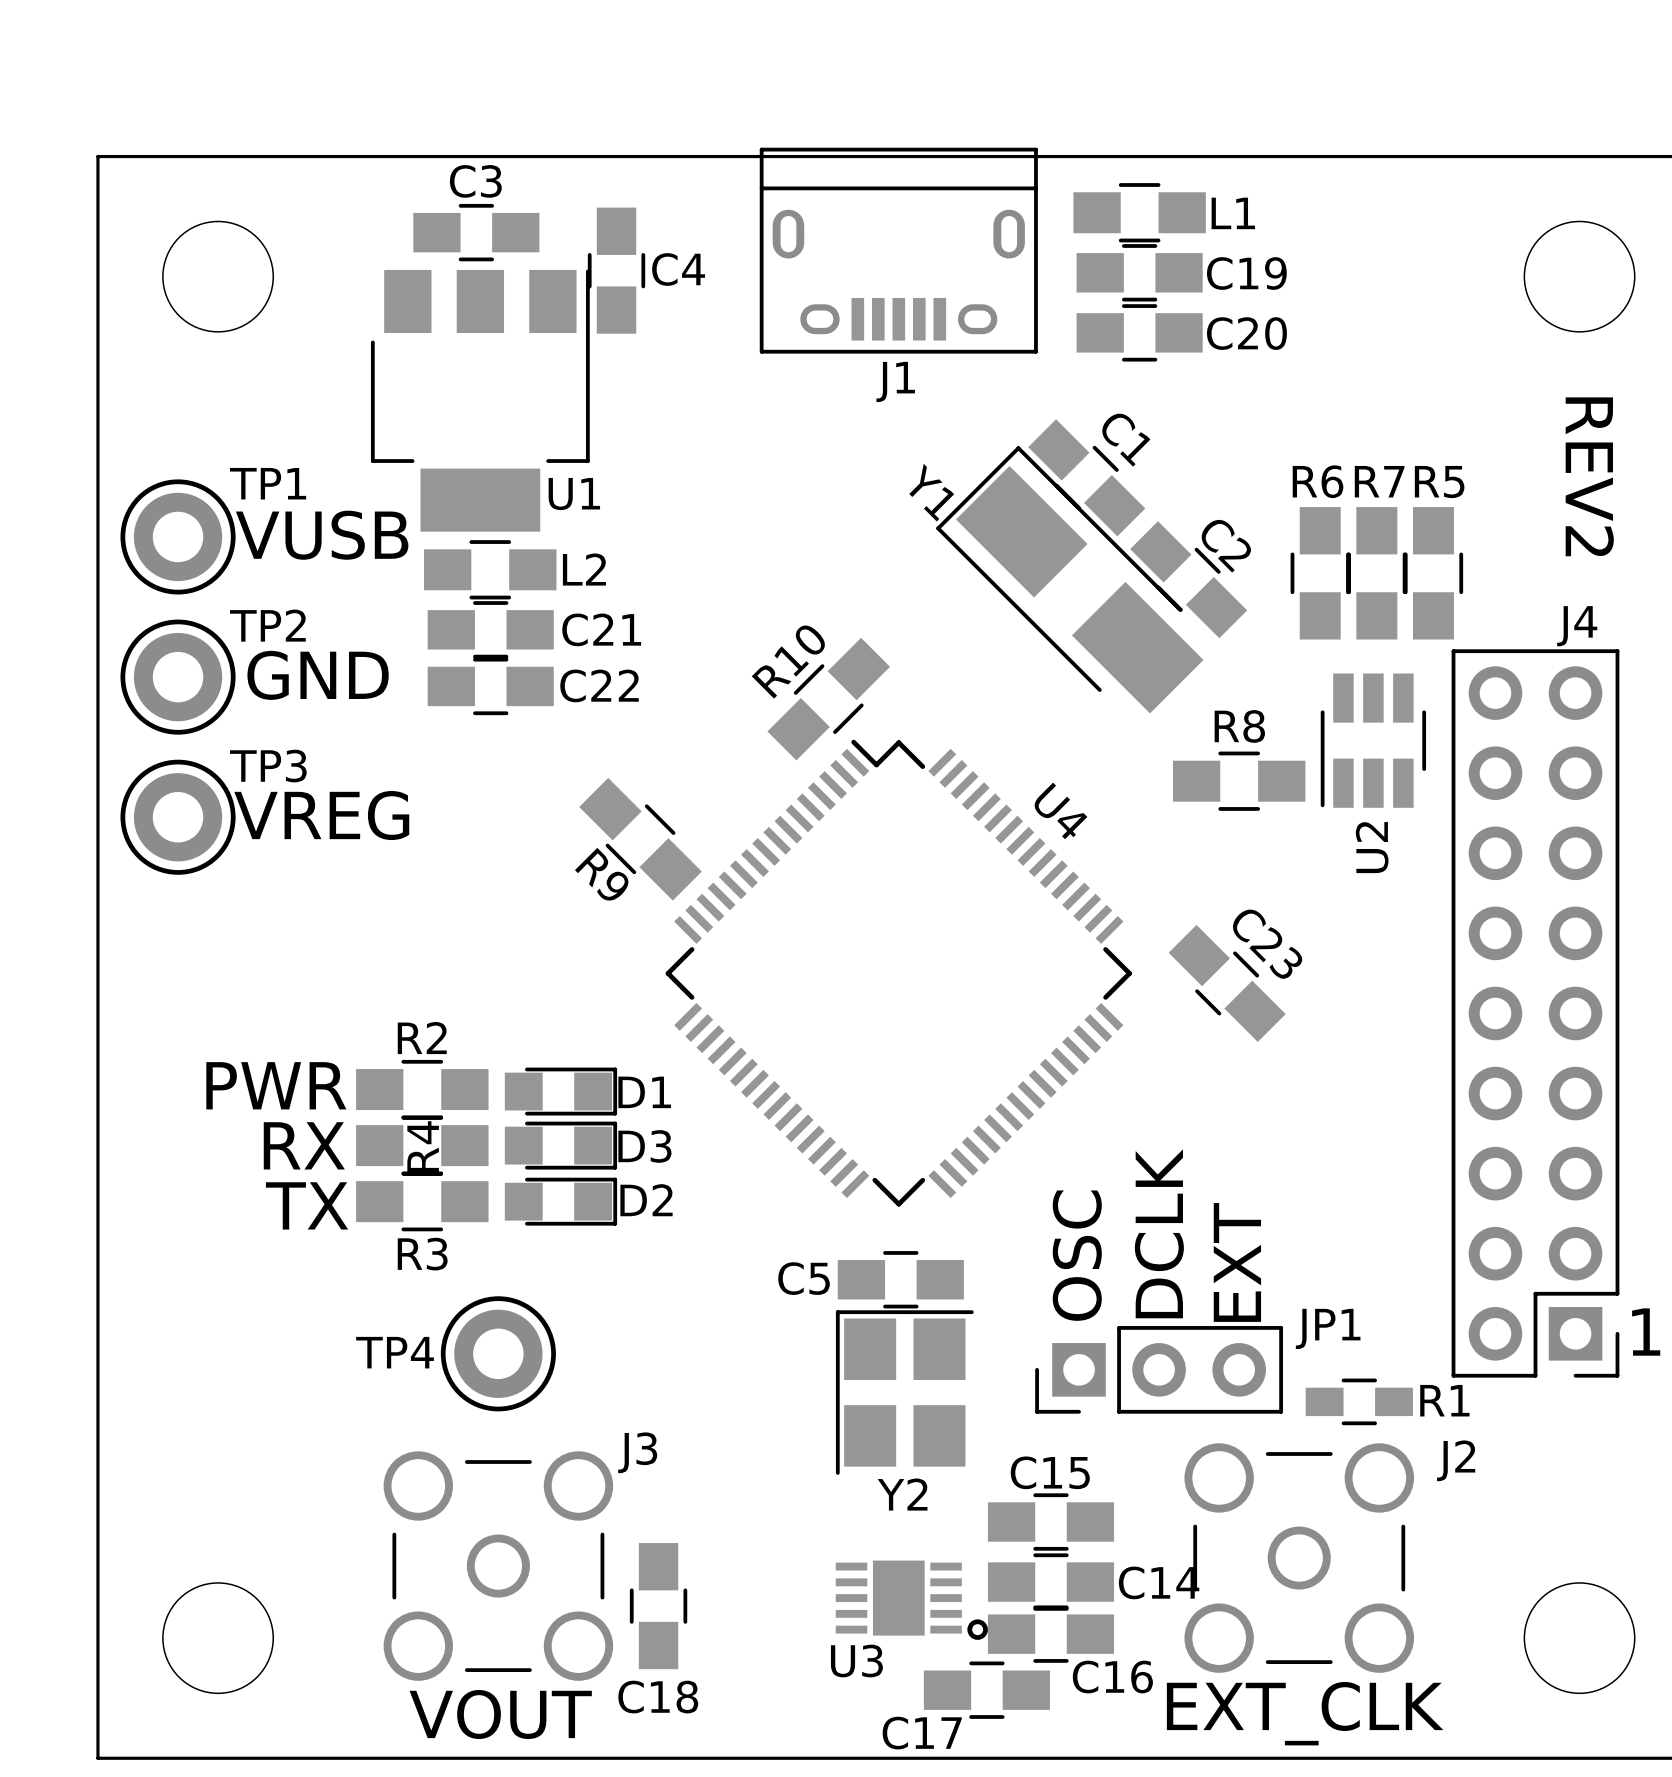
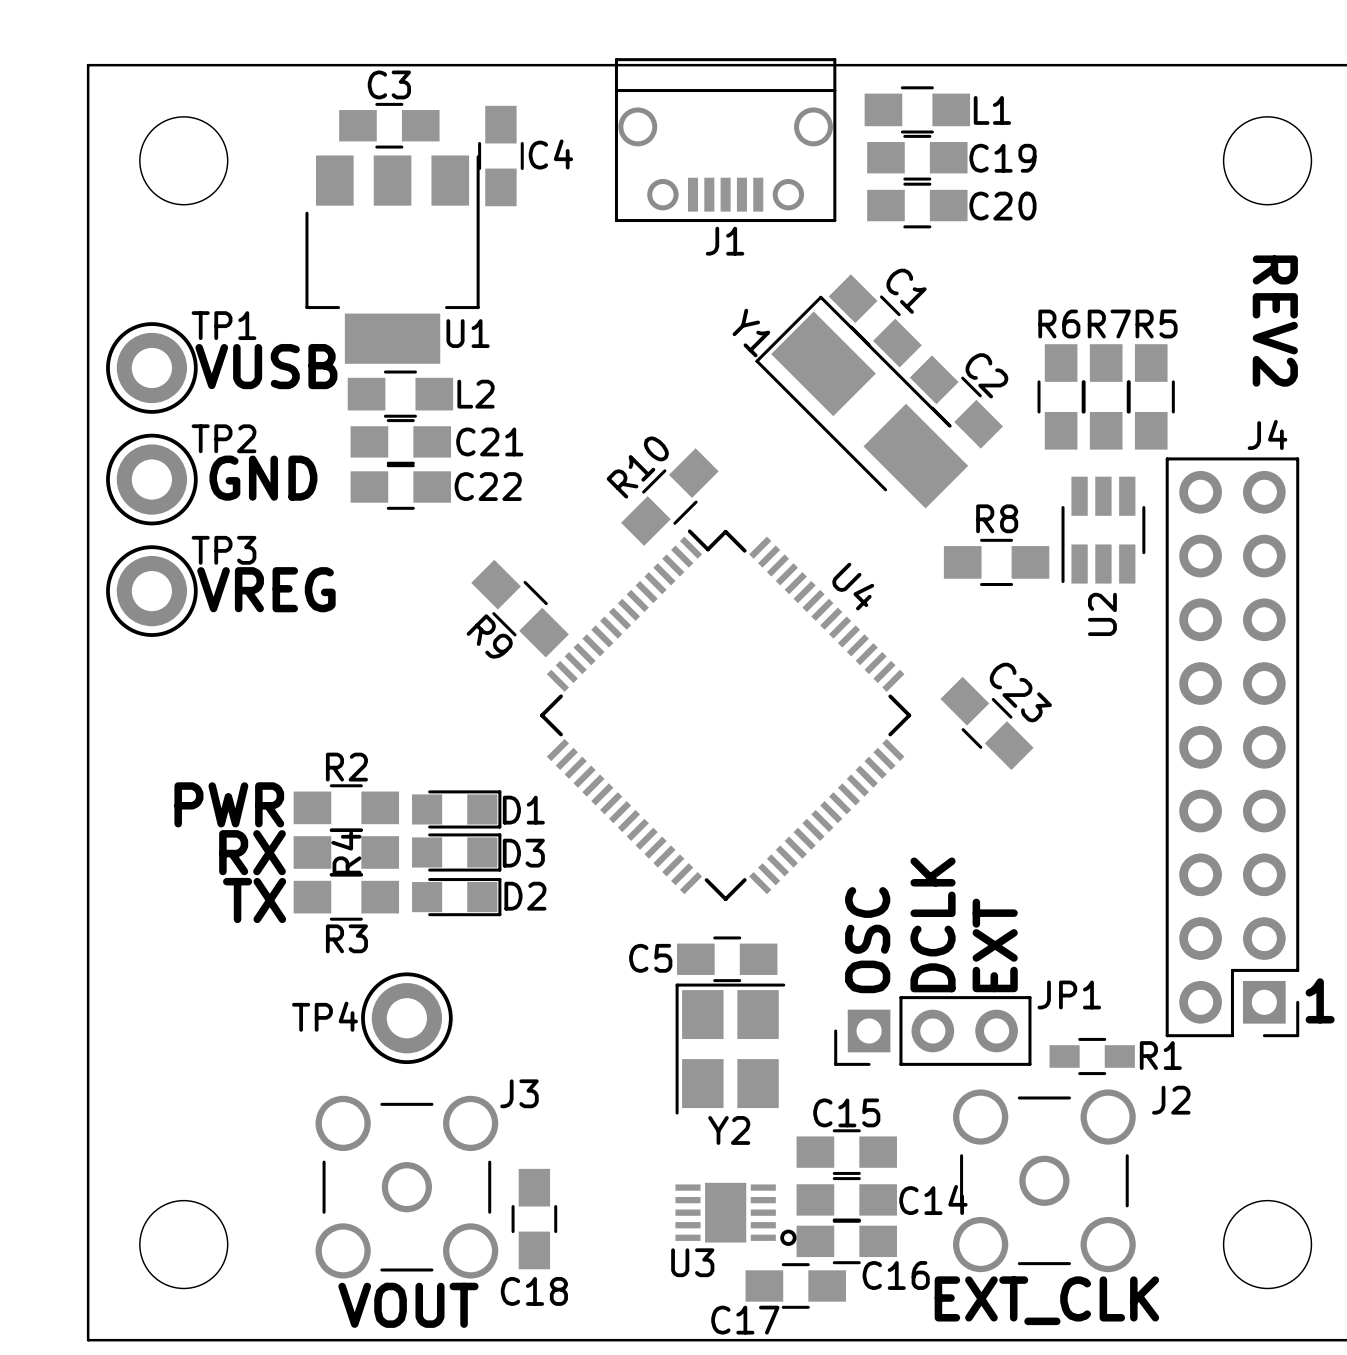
J1 footprint: [759, 147, 1038, 354] -> [614, 58, 837, 223]

